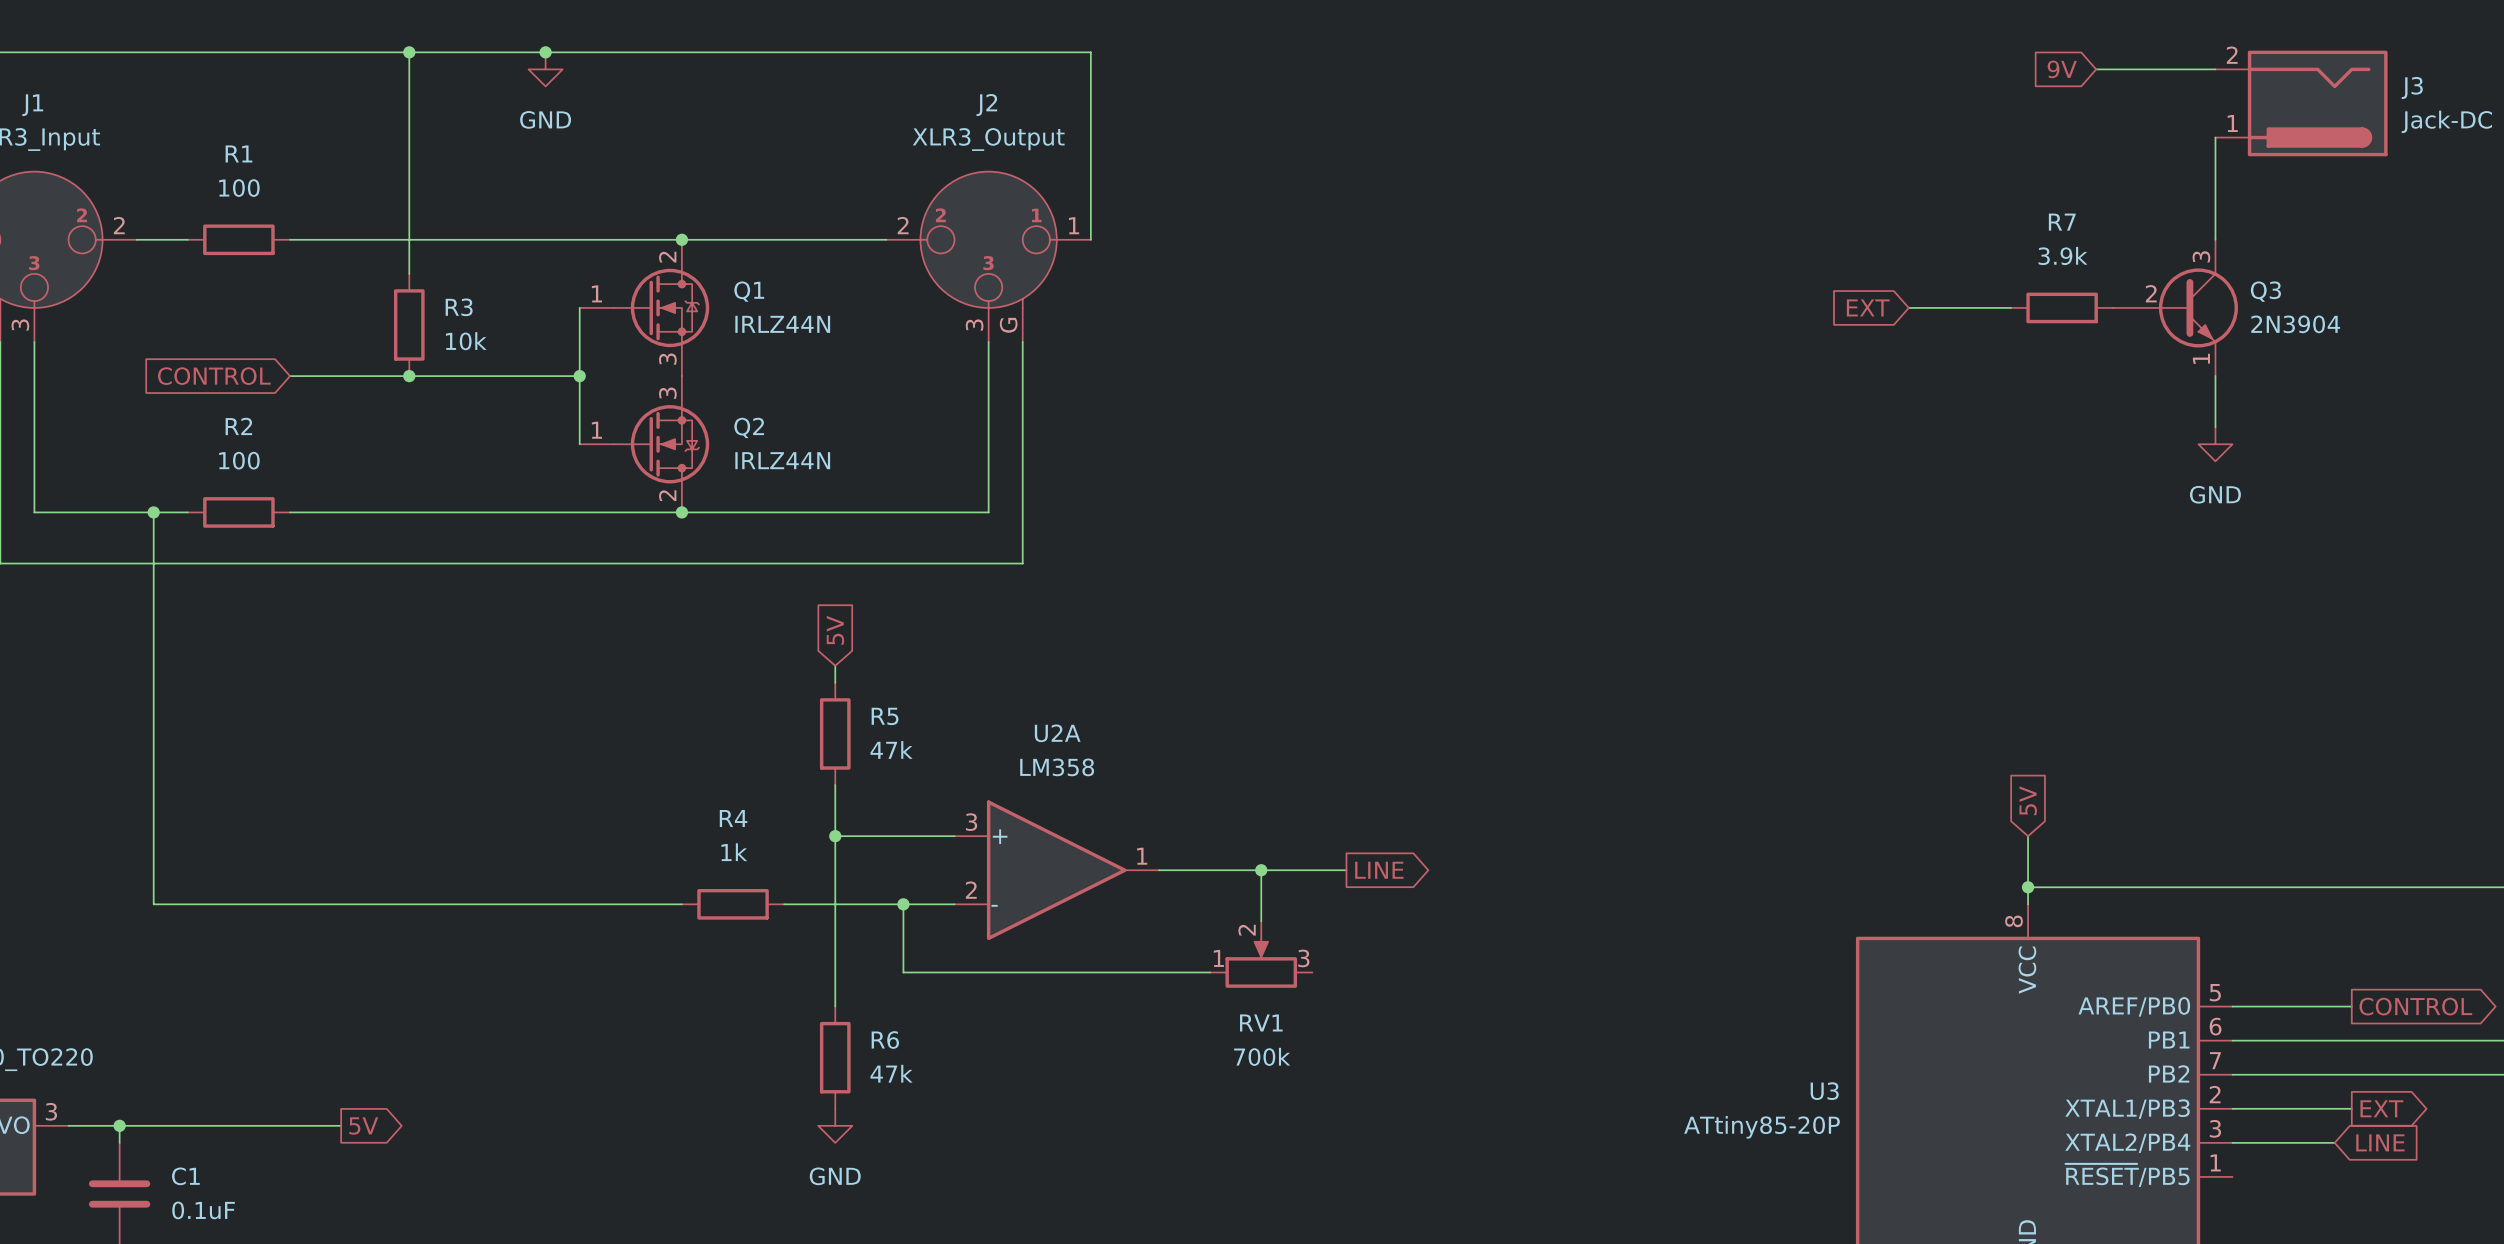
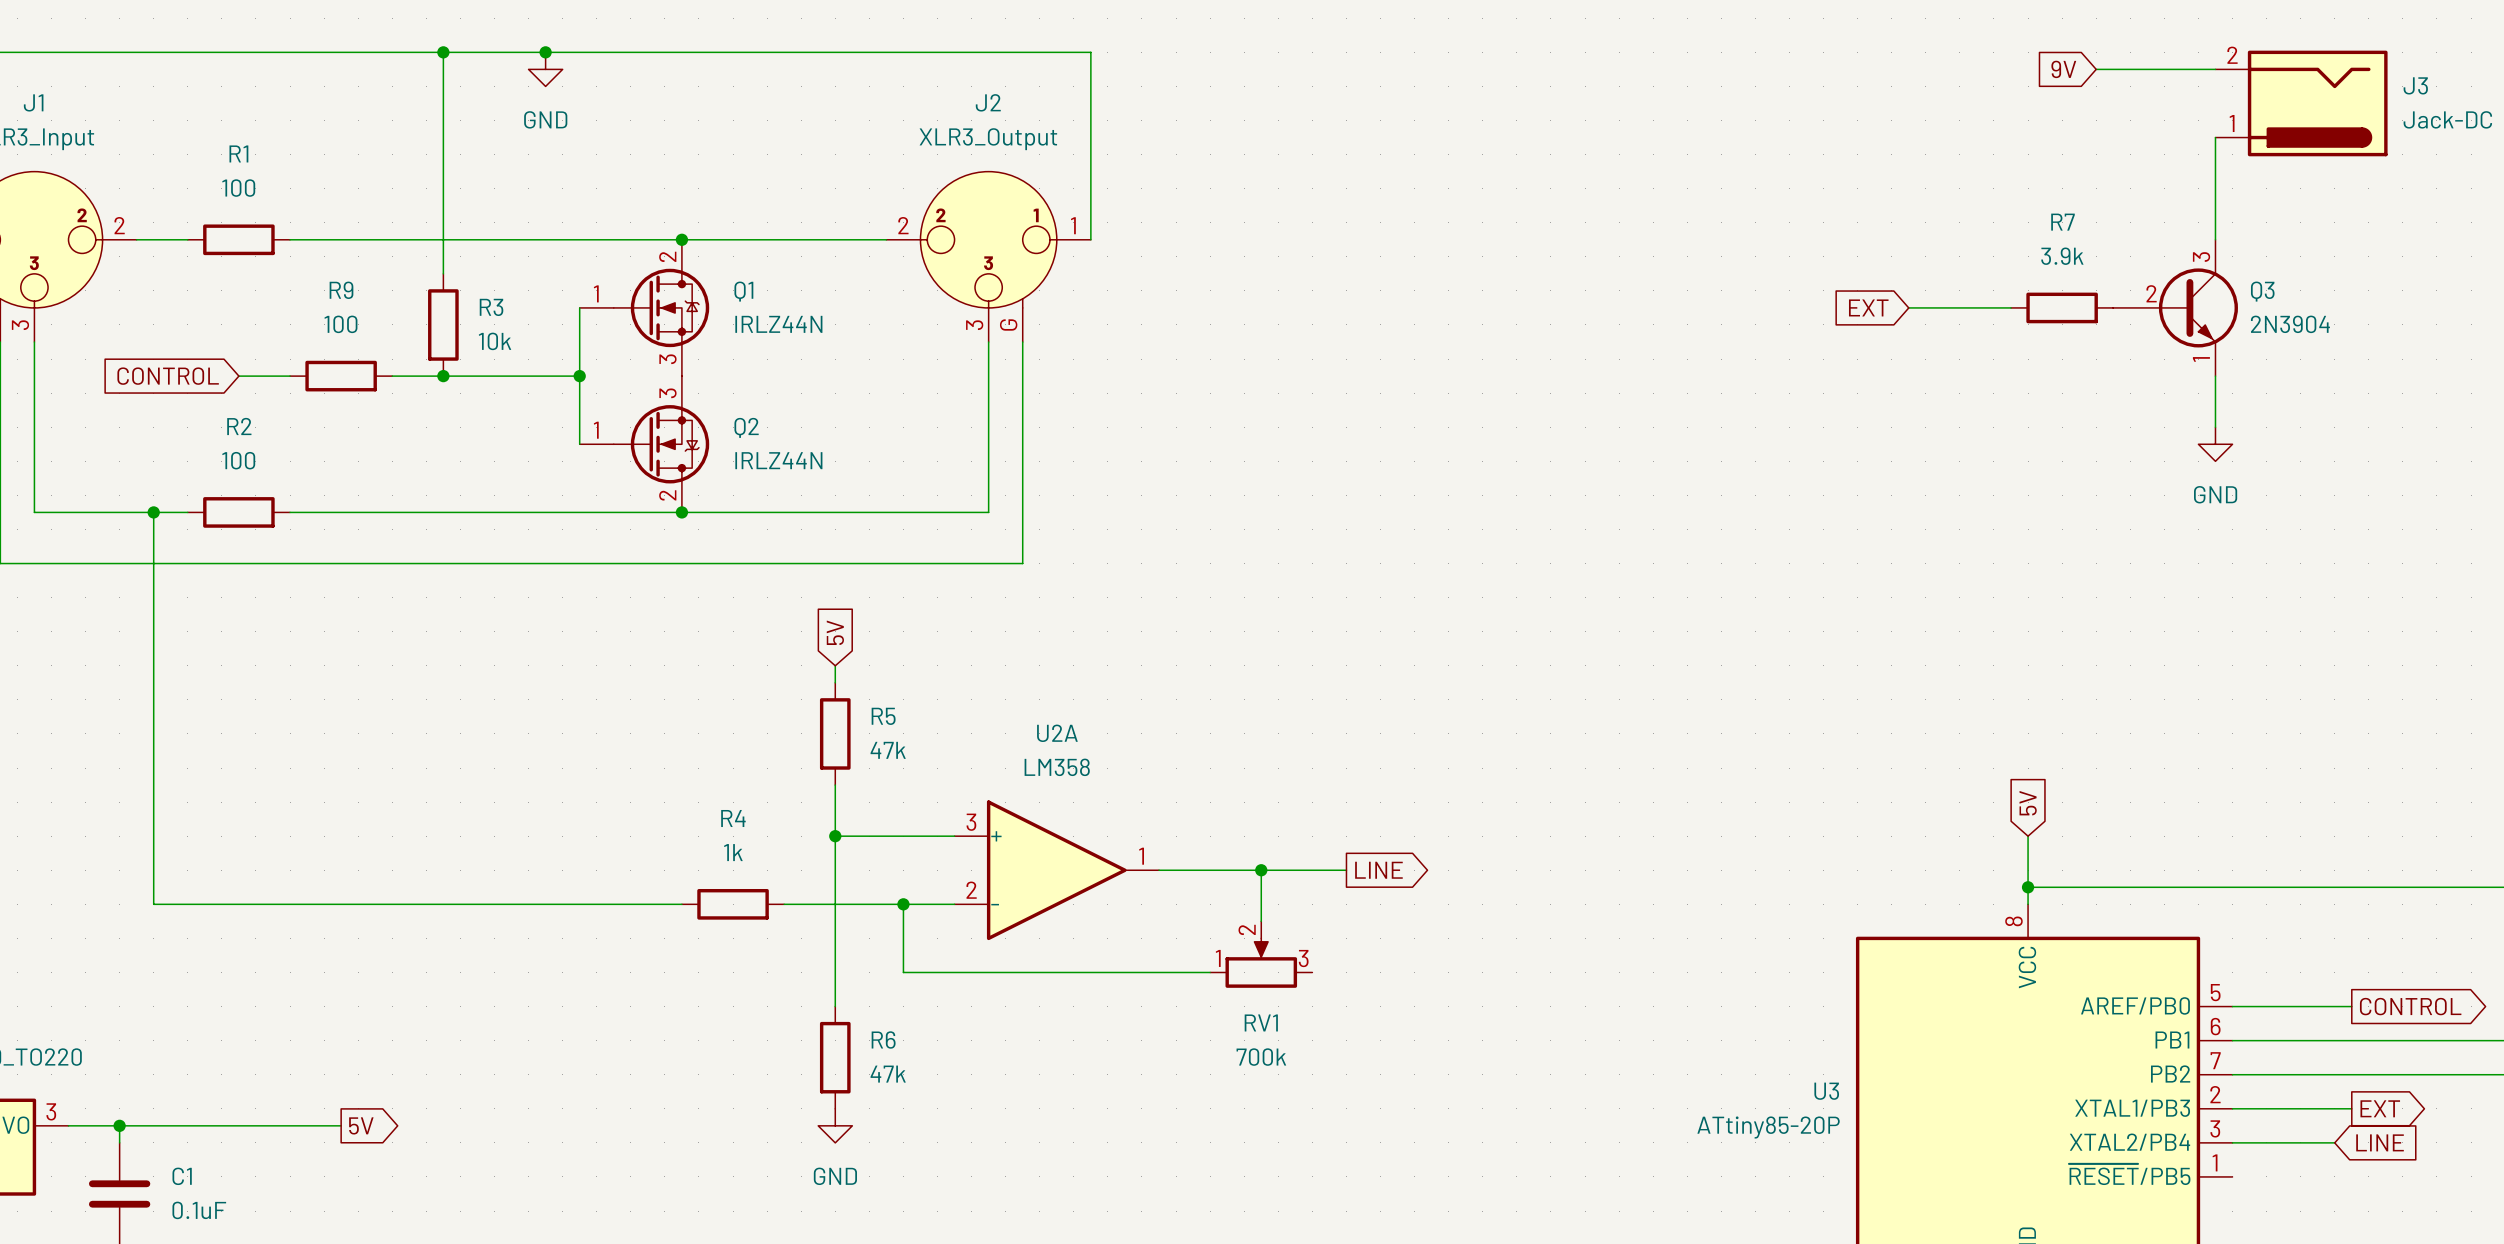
wire: (409, 52) (409, 273) -> (443, 52) (443, 273)
junction position: (409, 52) -> (443, 52)
R3 position: (409, 324) -> (443, 324)
global label position: CONTROL (214, 376) -> CONTROL (168, 376)
wire: (290, 376) (392, 376) -> (290, 376) (238, 376)
R9: none -> 100 (341, 376)
junction position: (409, 376) -> (443, 376)

